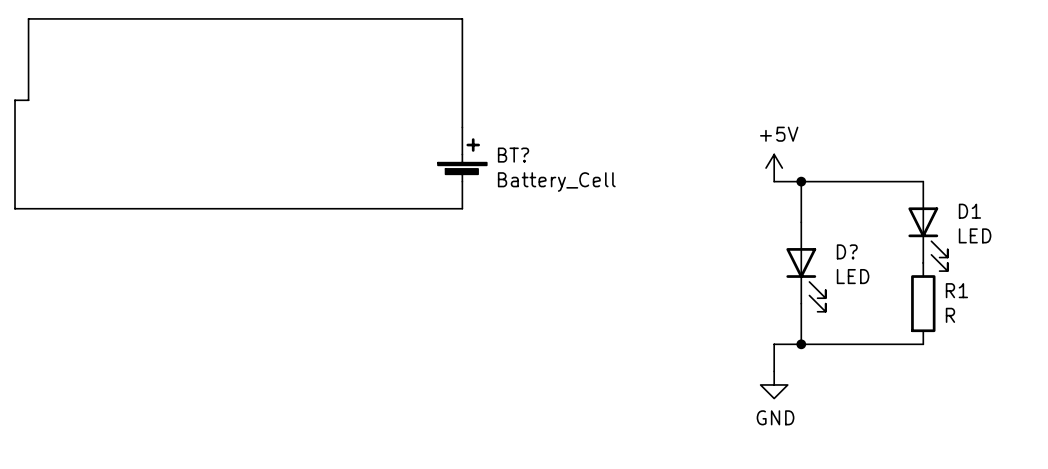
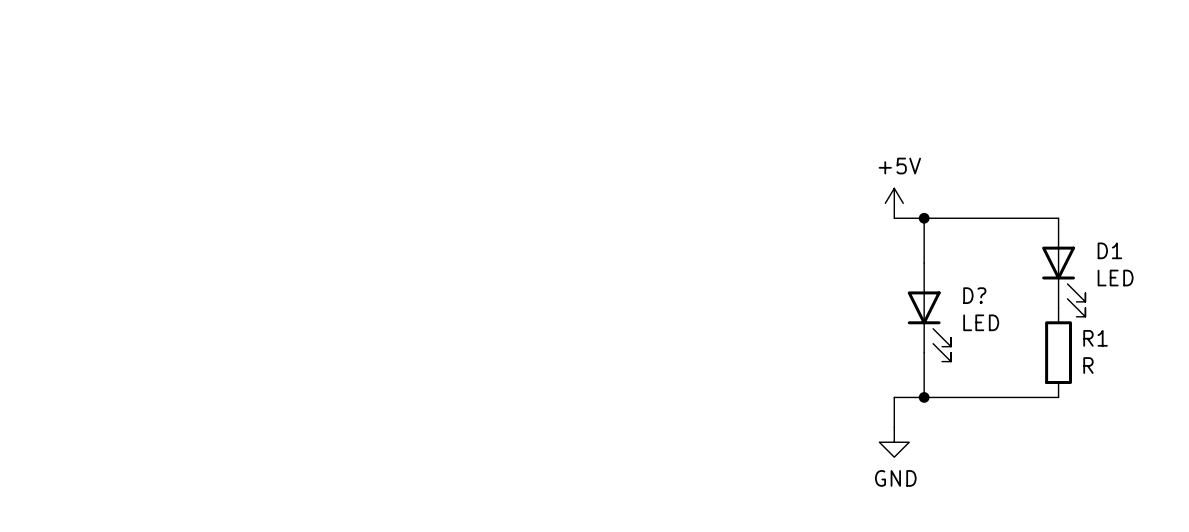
wire: (462, 127) (462, 18) (28, 18) (28, 100) (15, 100) (15, 208) (462, 208) -> none
BT?: Battery_Cell (462, 168) -> none

